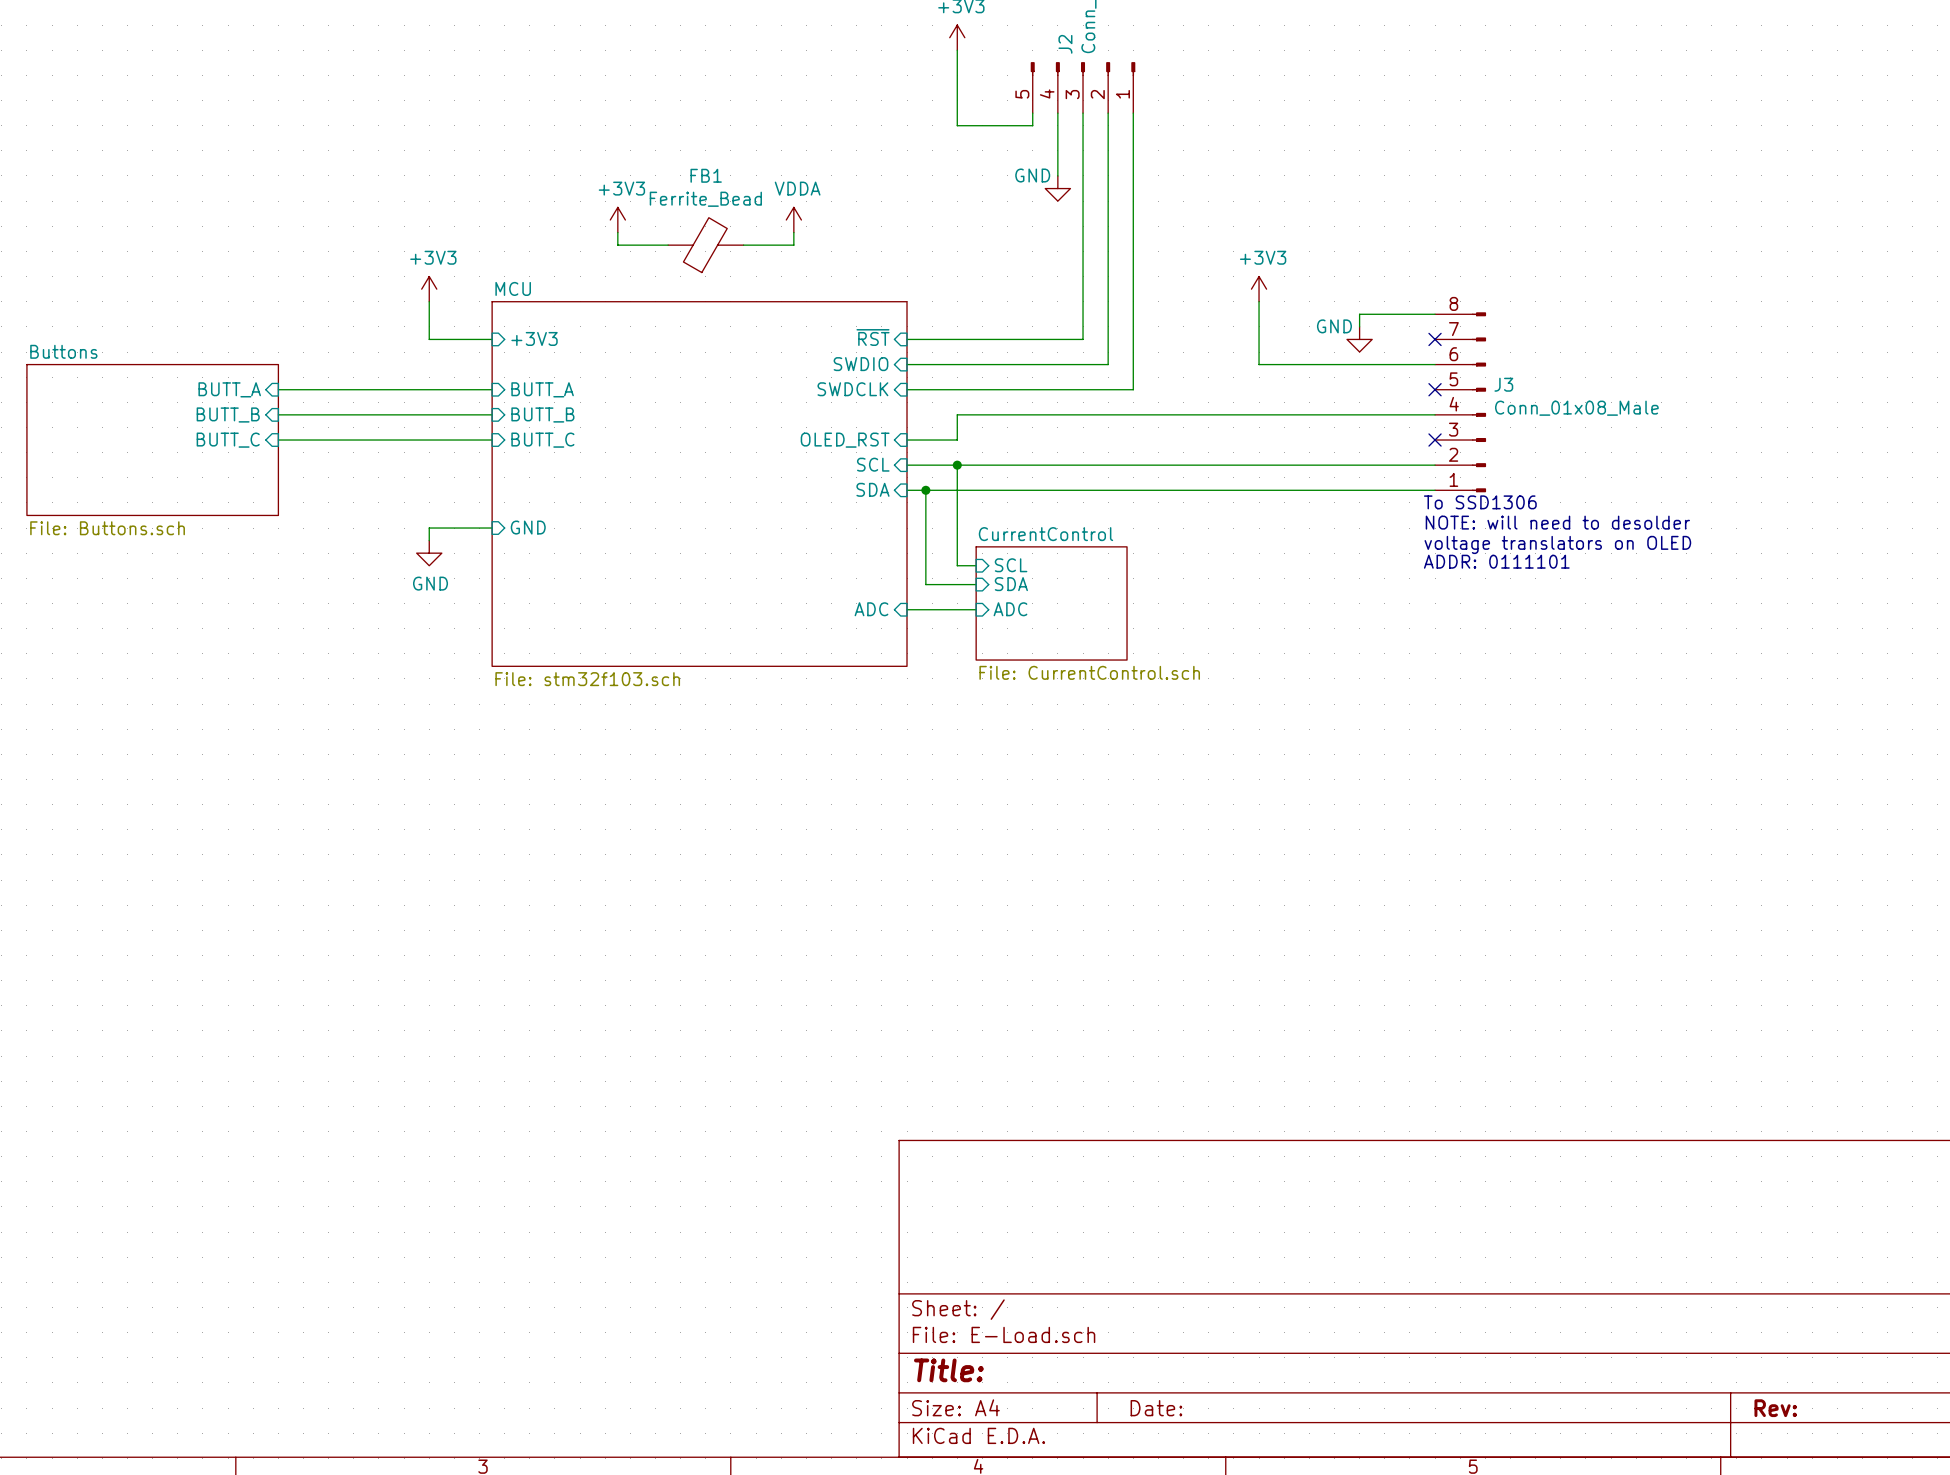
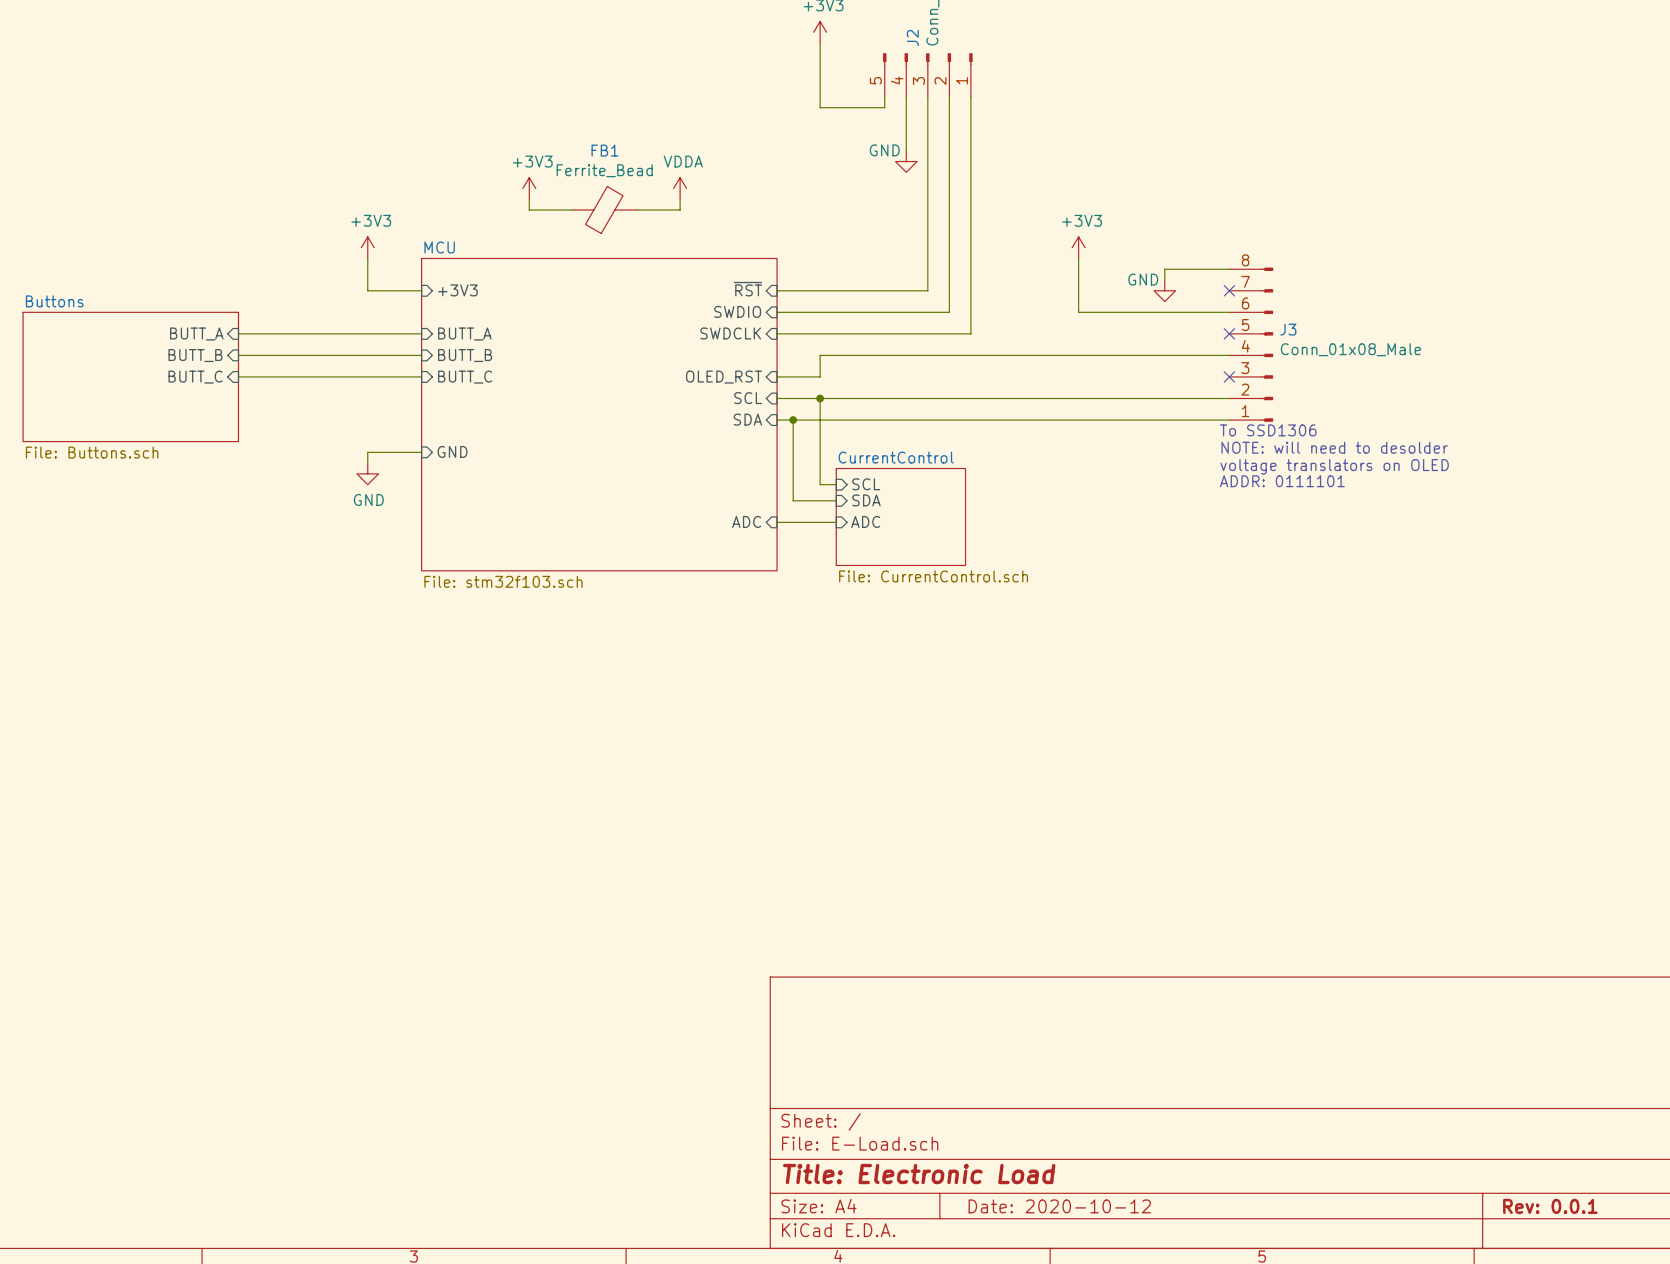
title block: Title: (948, 1370) -> Title: Electronic Load (919, 1174)
title block: Date: (1156, 1408) -> Date: 2020-10-12 (1059, 1206)
title block: Rev: (1775, 1408) -> Rev: 0.0.1 (1550, 1206)

